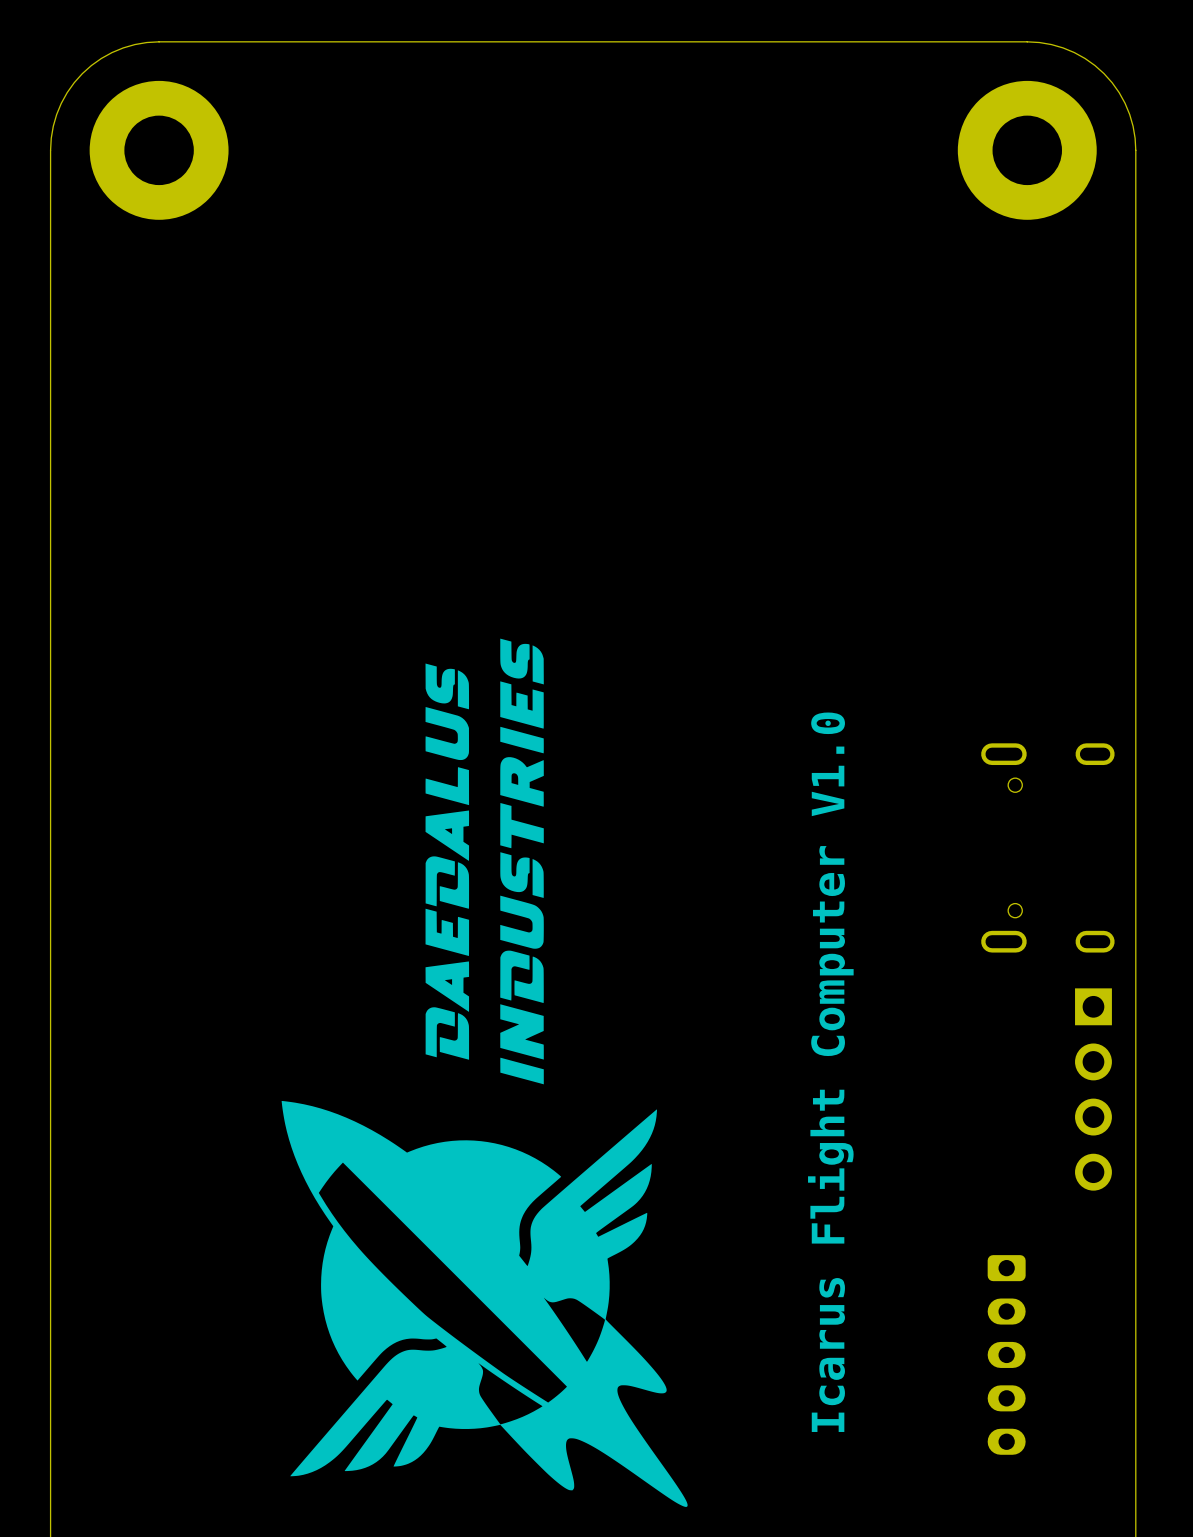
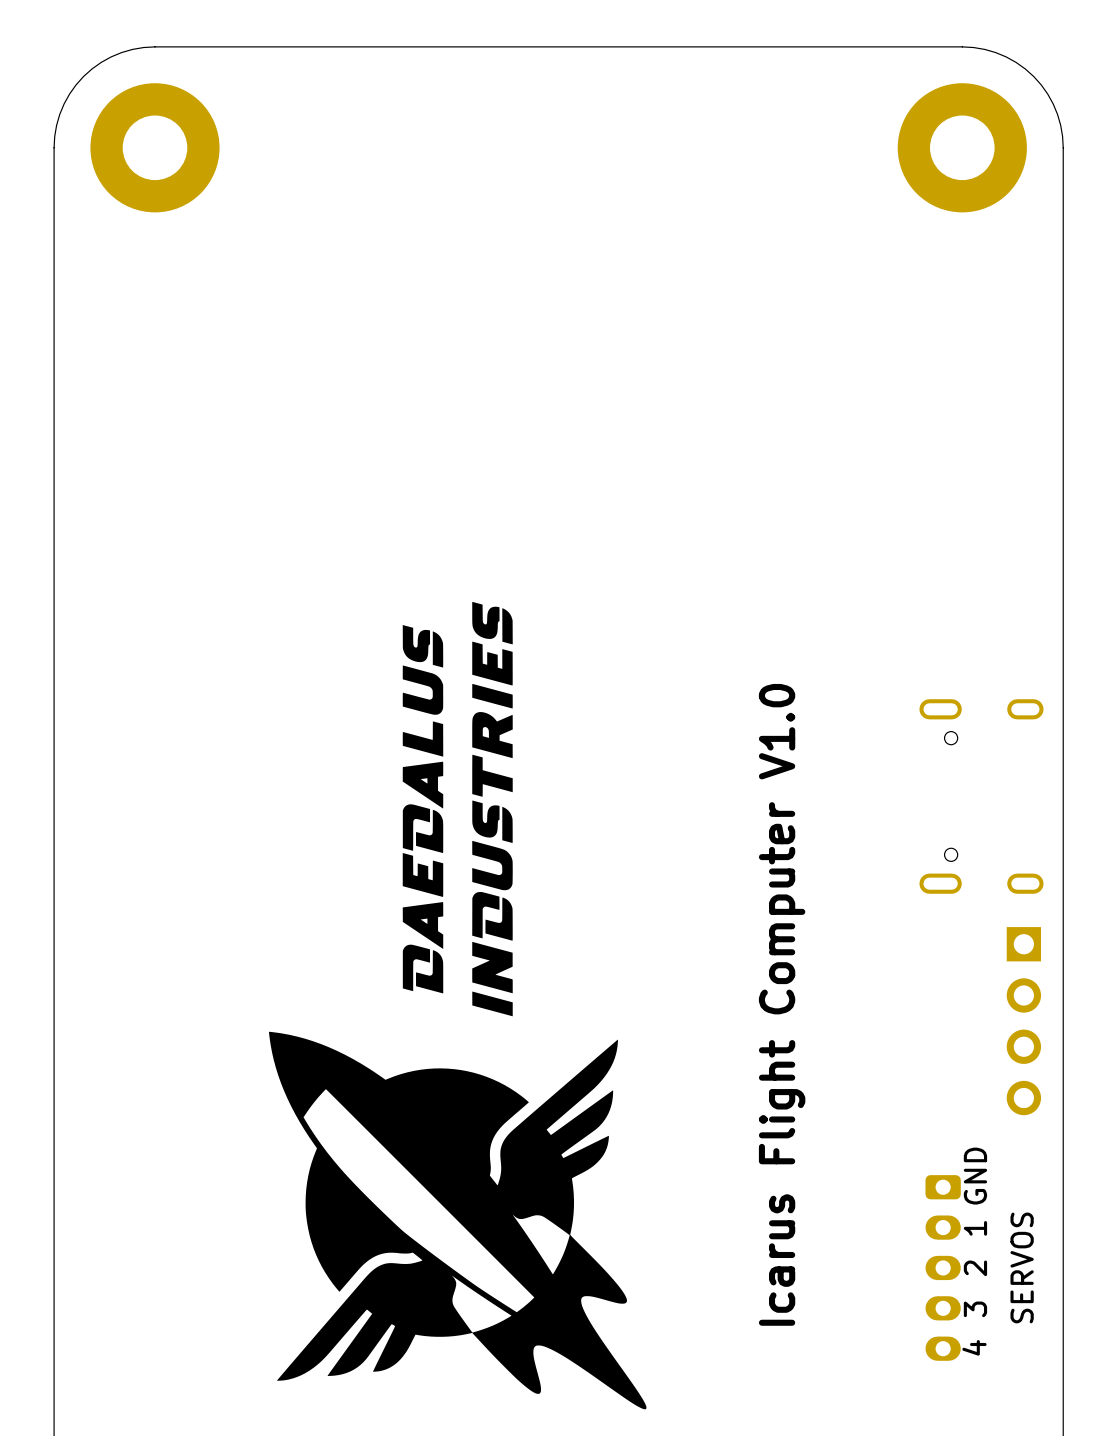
text: none -> GND (975, 1176)
text: none -> 1 (975, 1228)
text: none -> 2 (975, 1268)
text: none -> SERVOS (1022, 1267)
text: none -> 3 (975, 1309)
text: none -> 4 (974, 1347)

